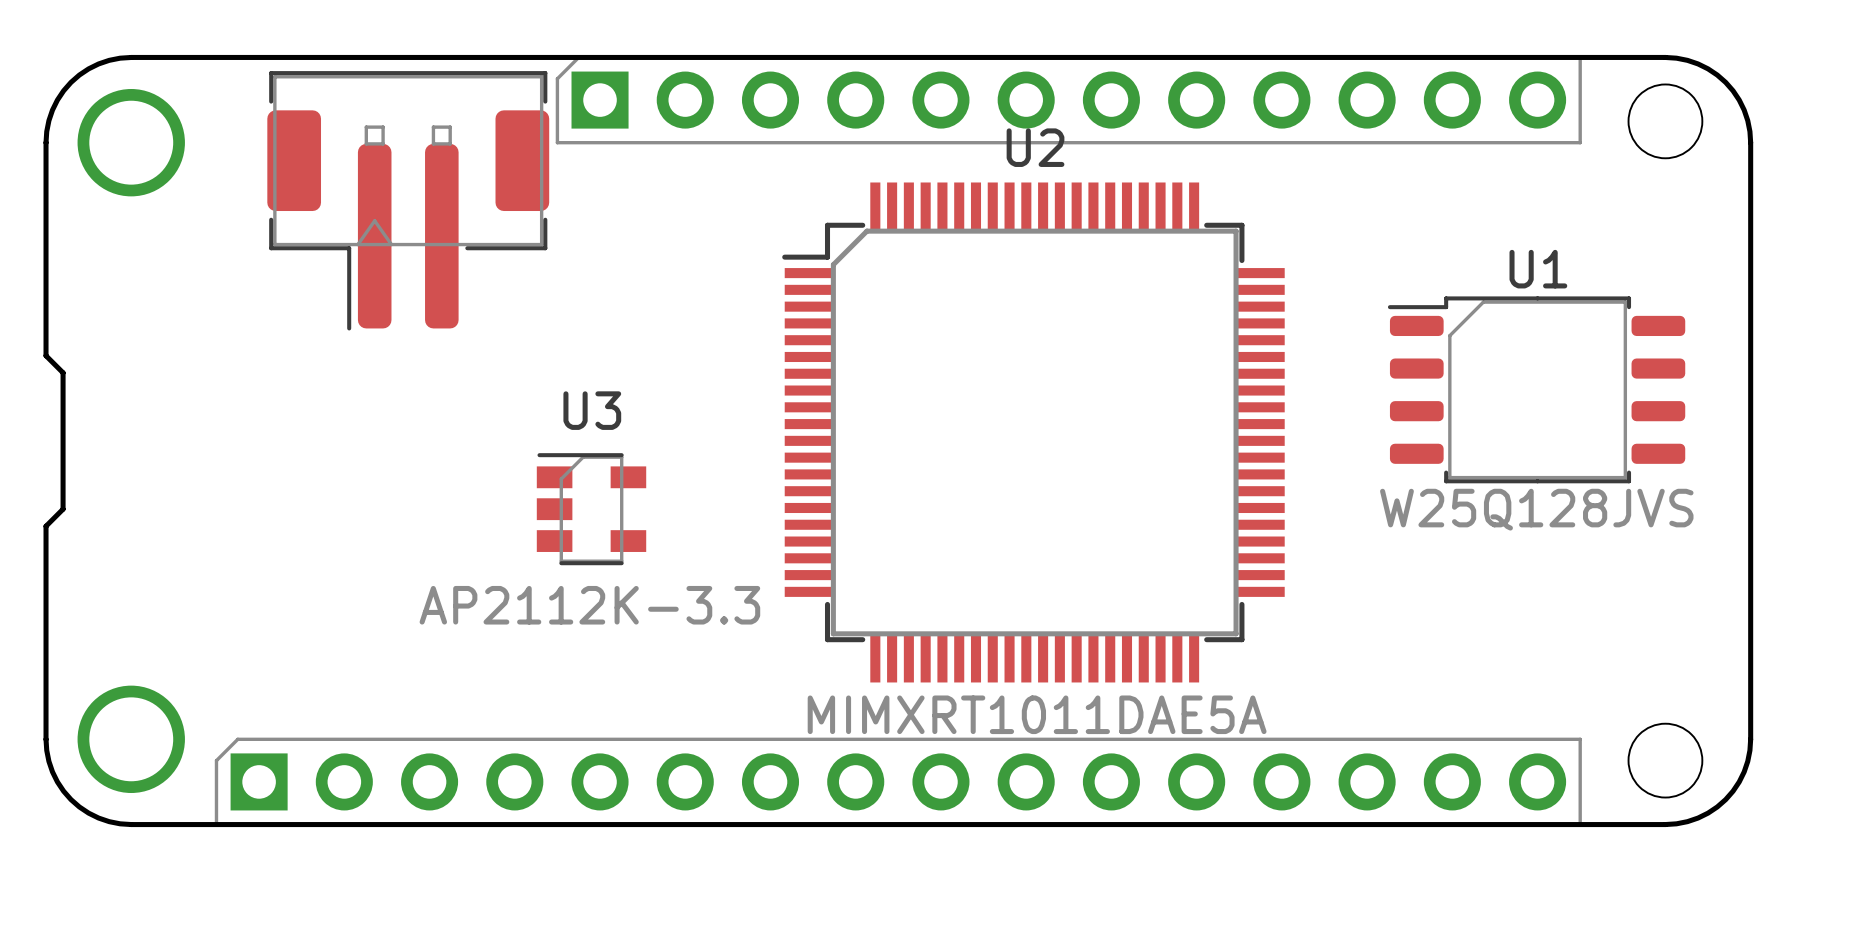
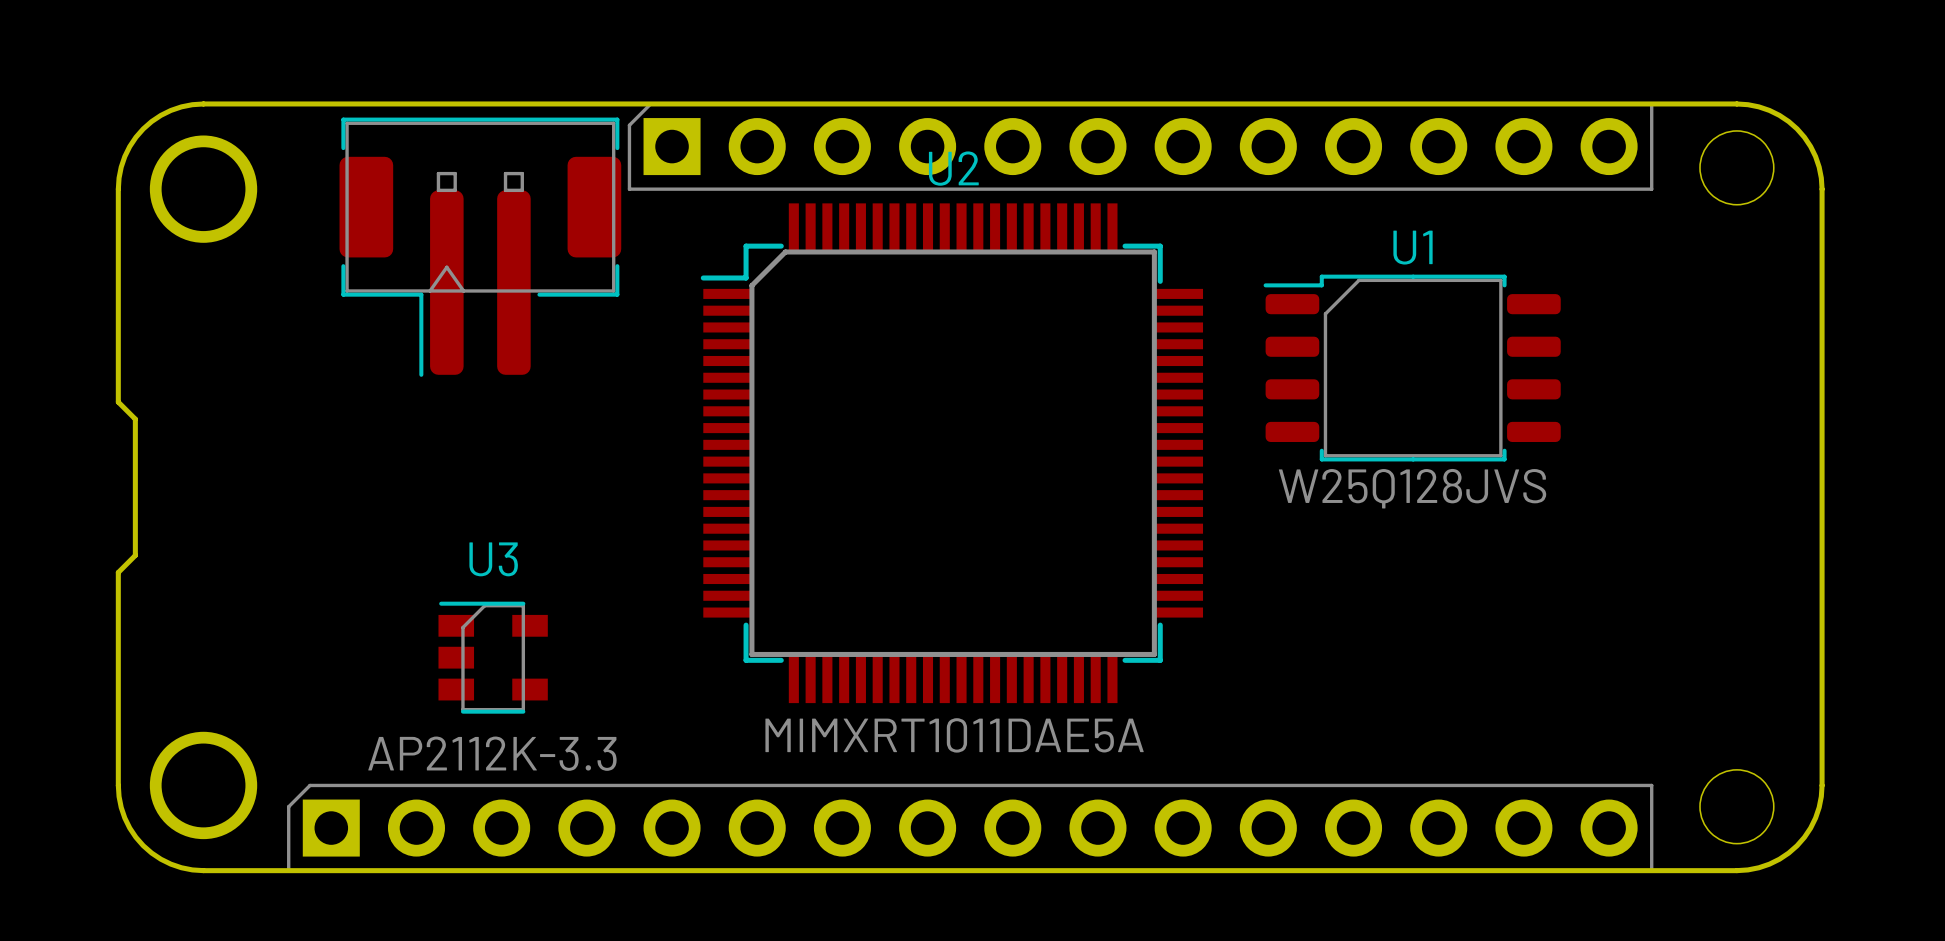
U1 position: (1536, 389) -> (1412, 368)
U2 position: (1033, 432) -> (951, 453)
U3 position: (591, 509) -> (493, 657)

